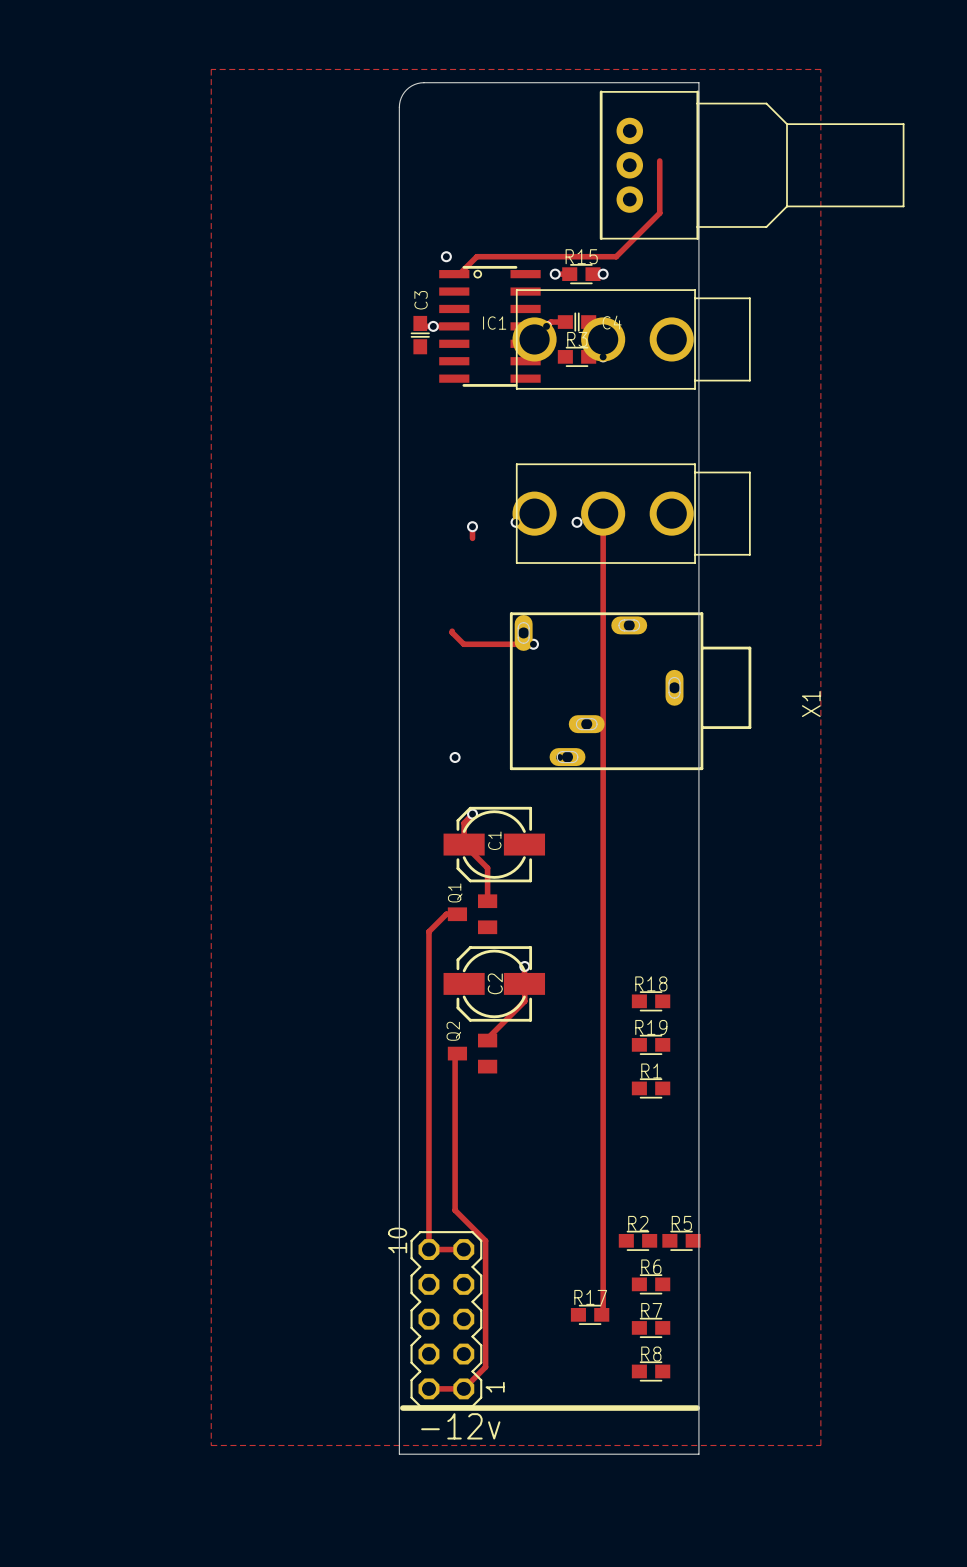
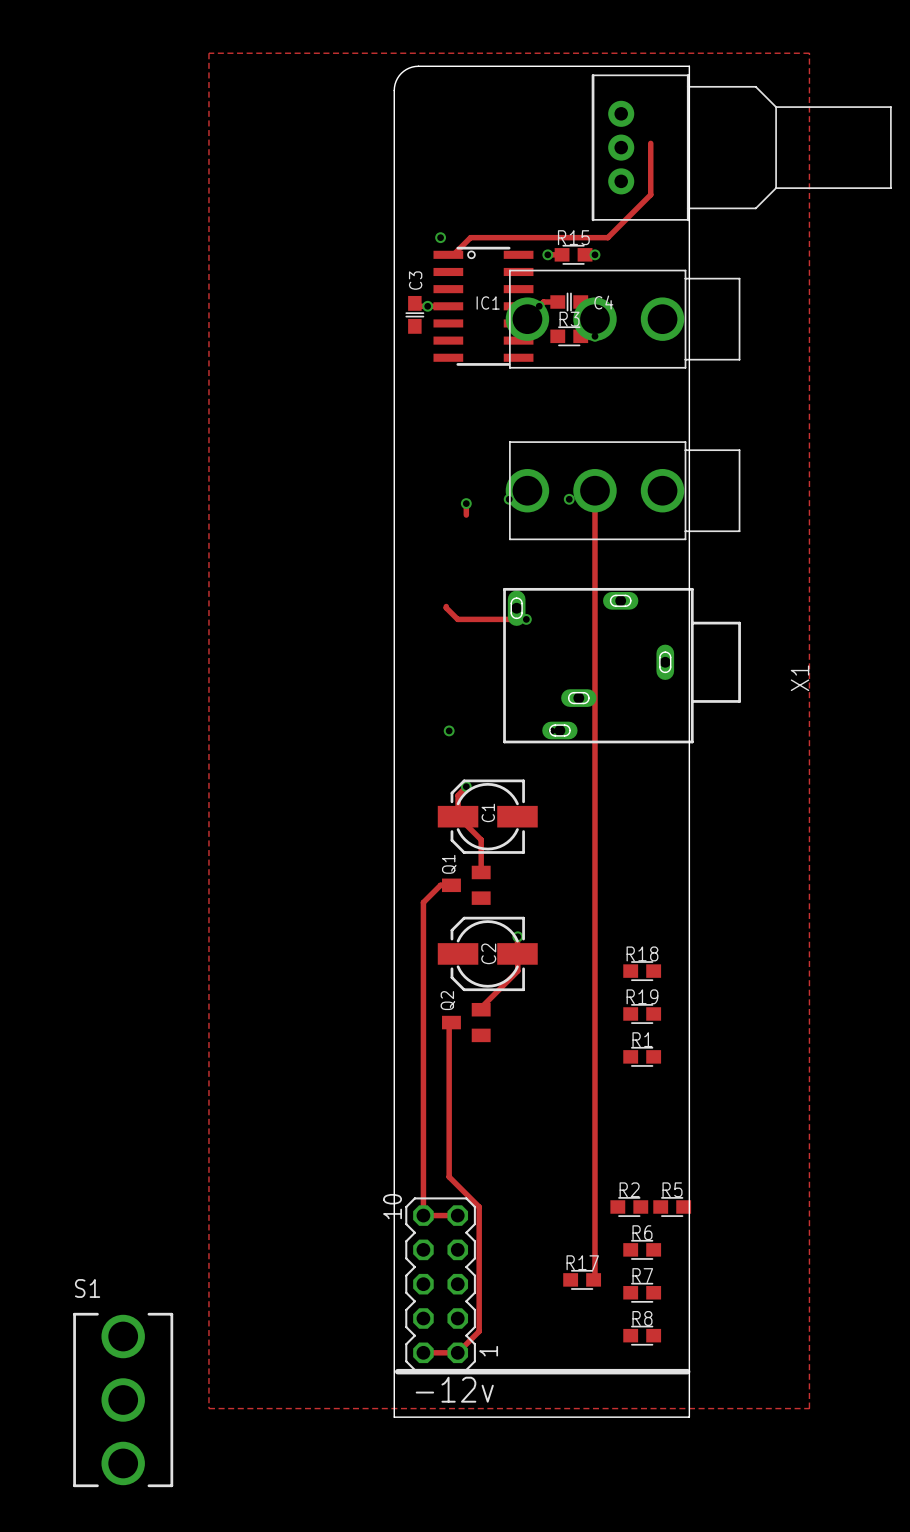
S1: none -> (123, 1399)

